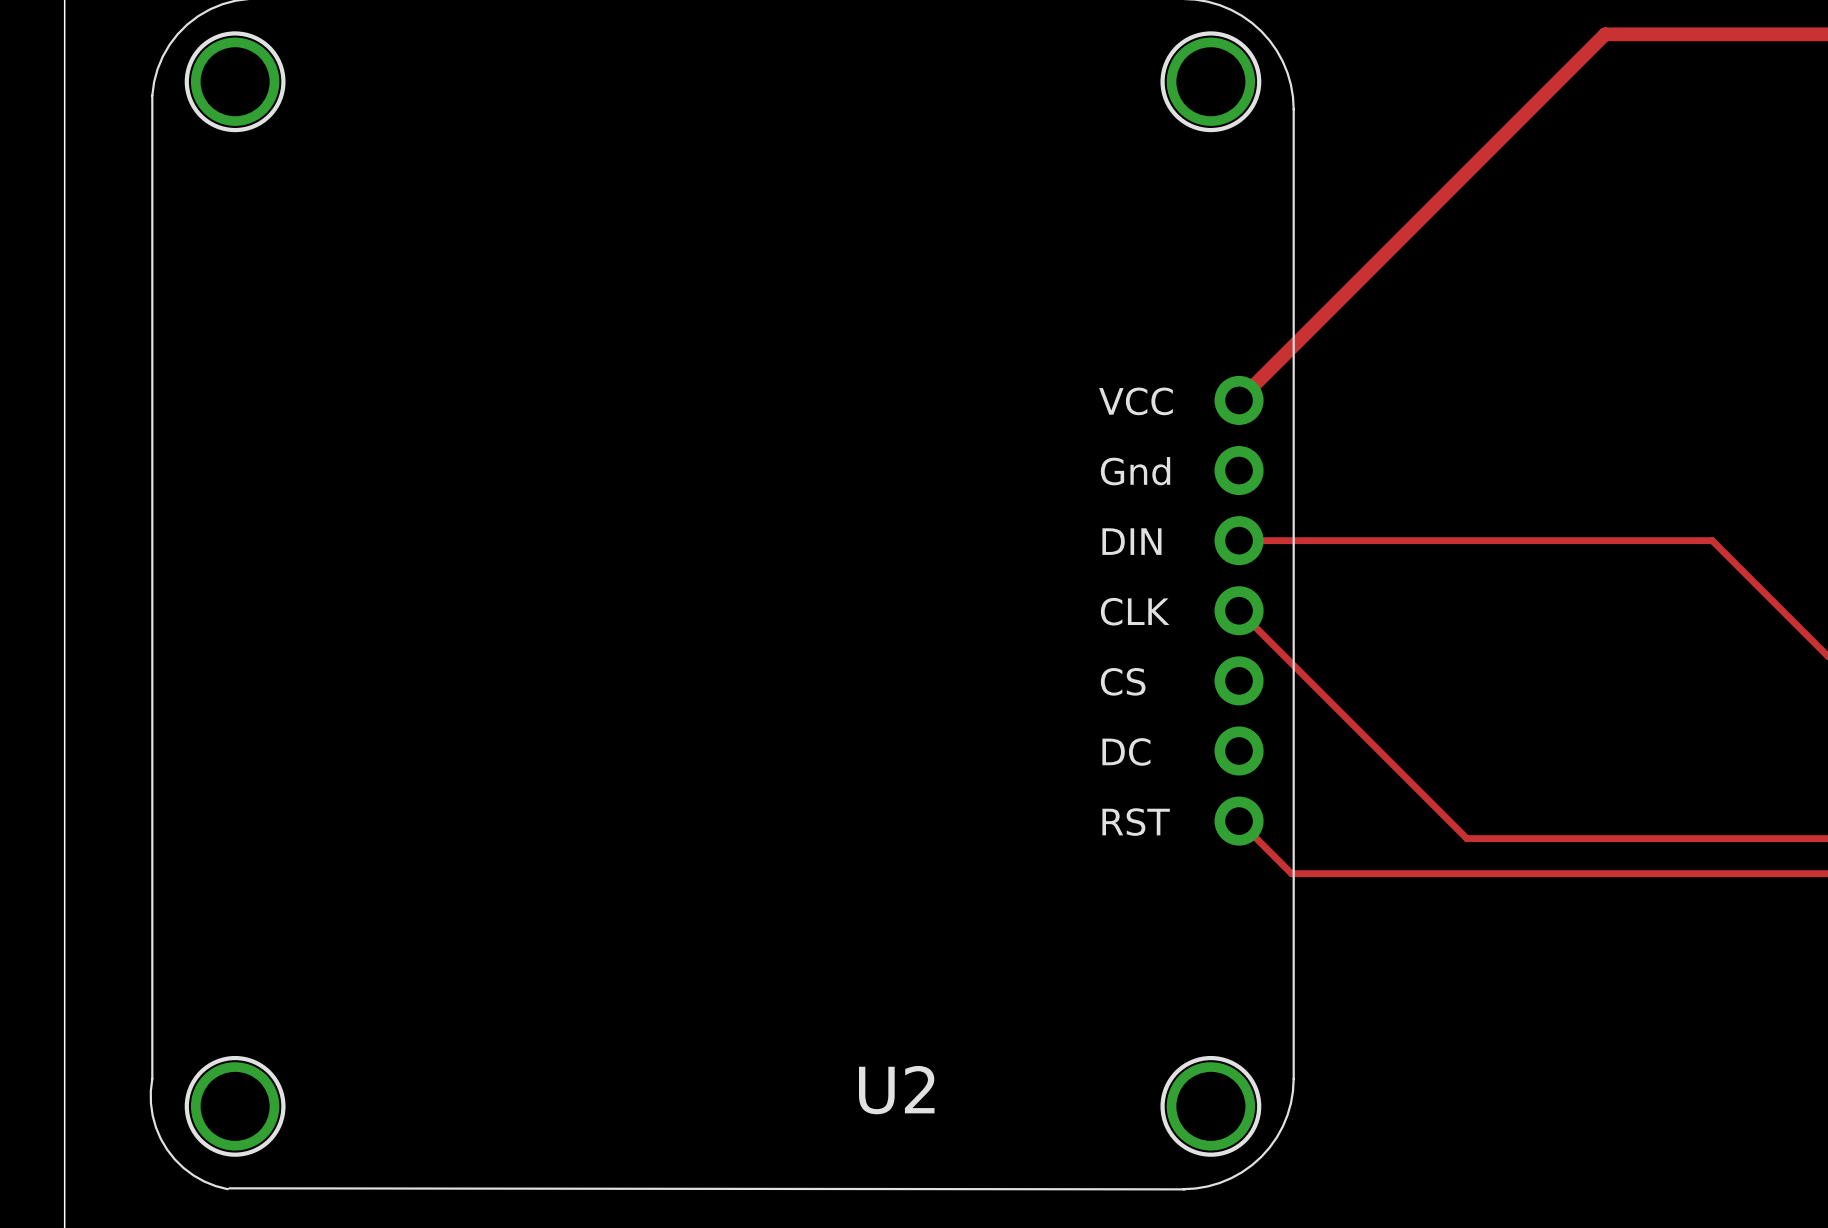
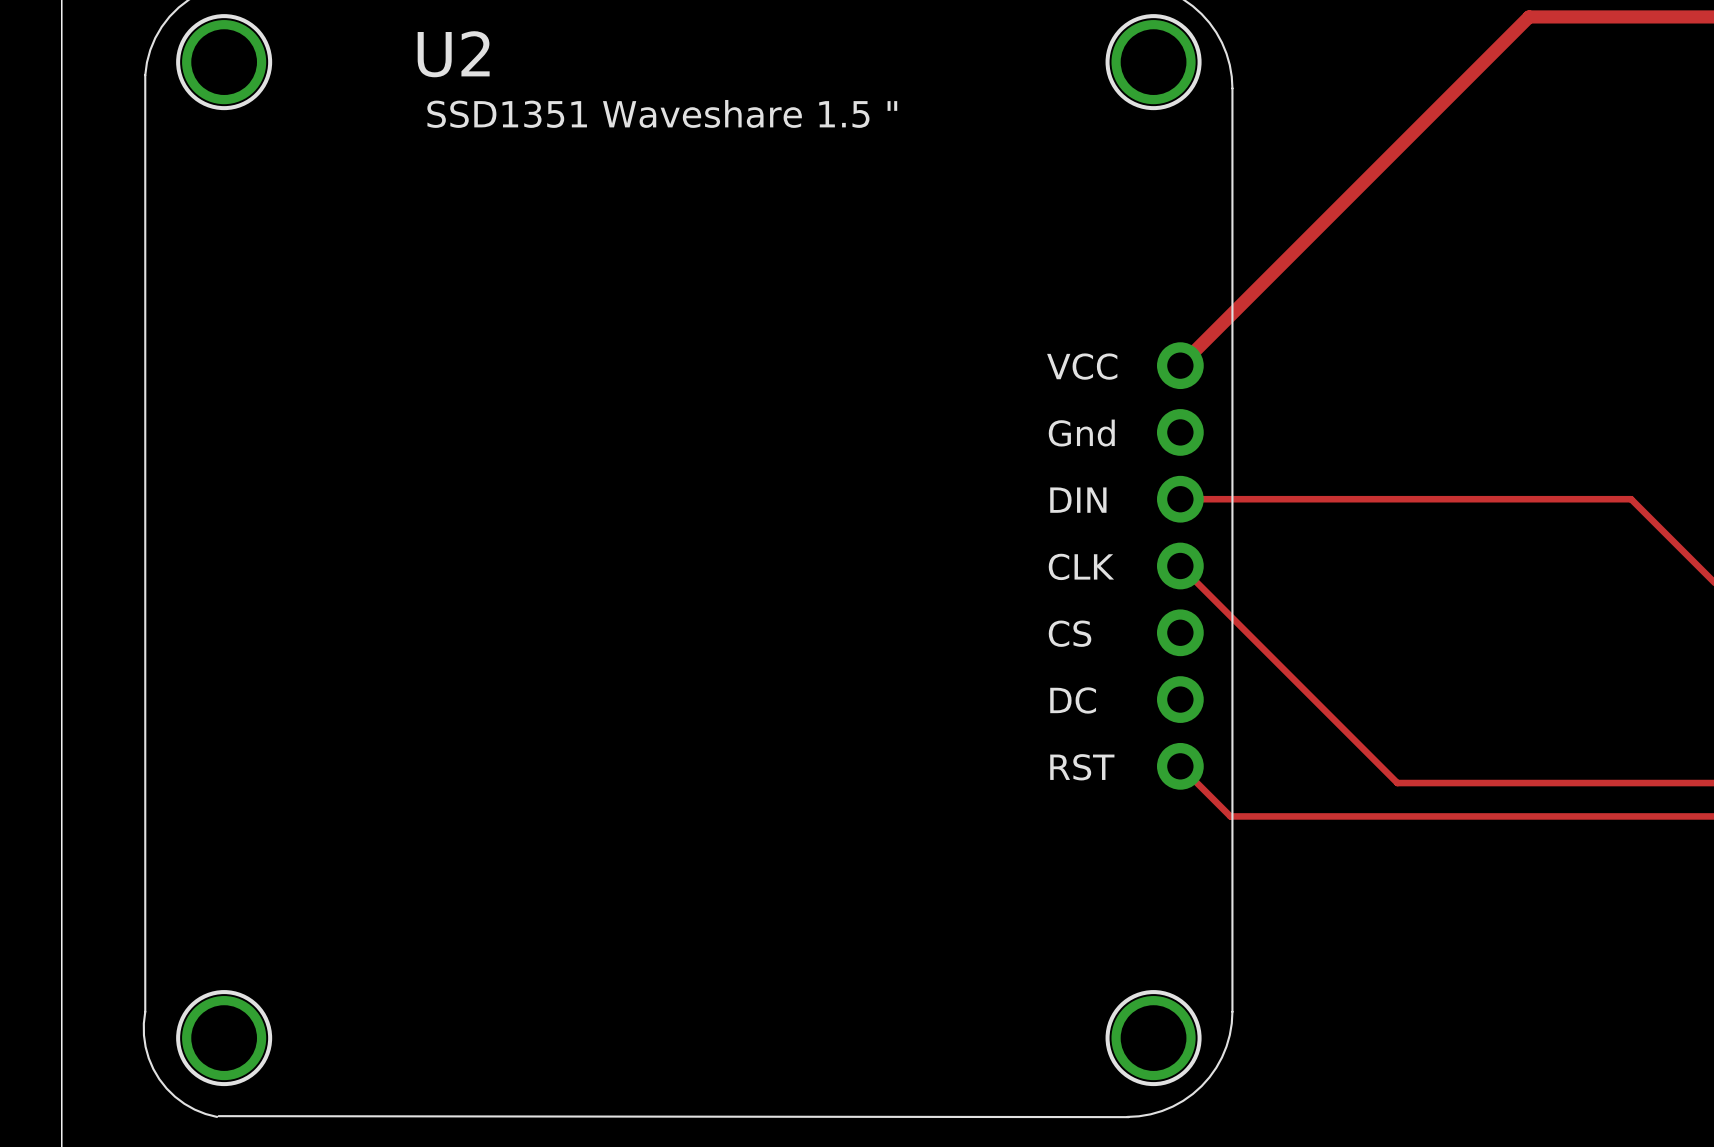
text: none -> SSD1351 Waveshare 1.5 " (662, 113)
U2 name position: U2 (896, 1090) -> U2 (453, 54)

